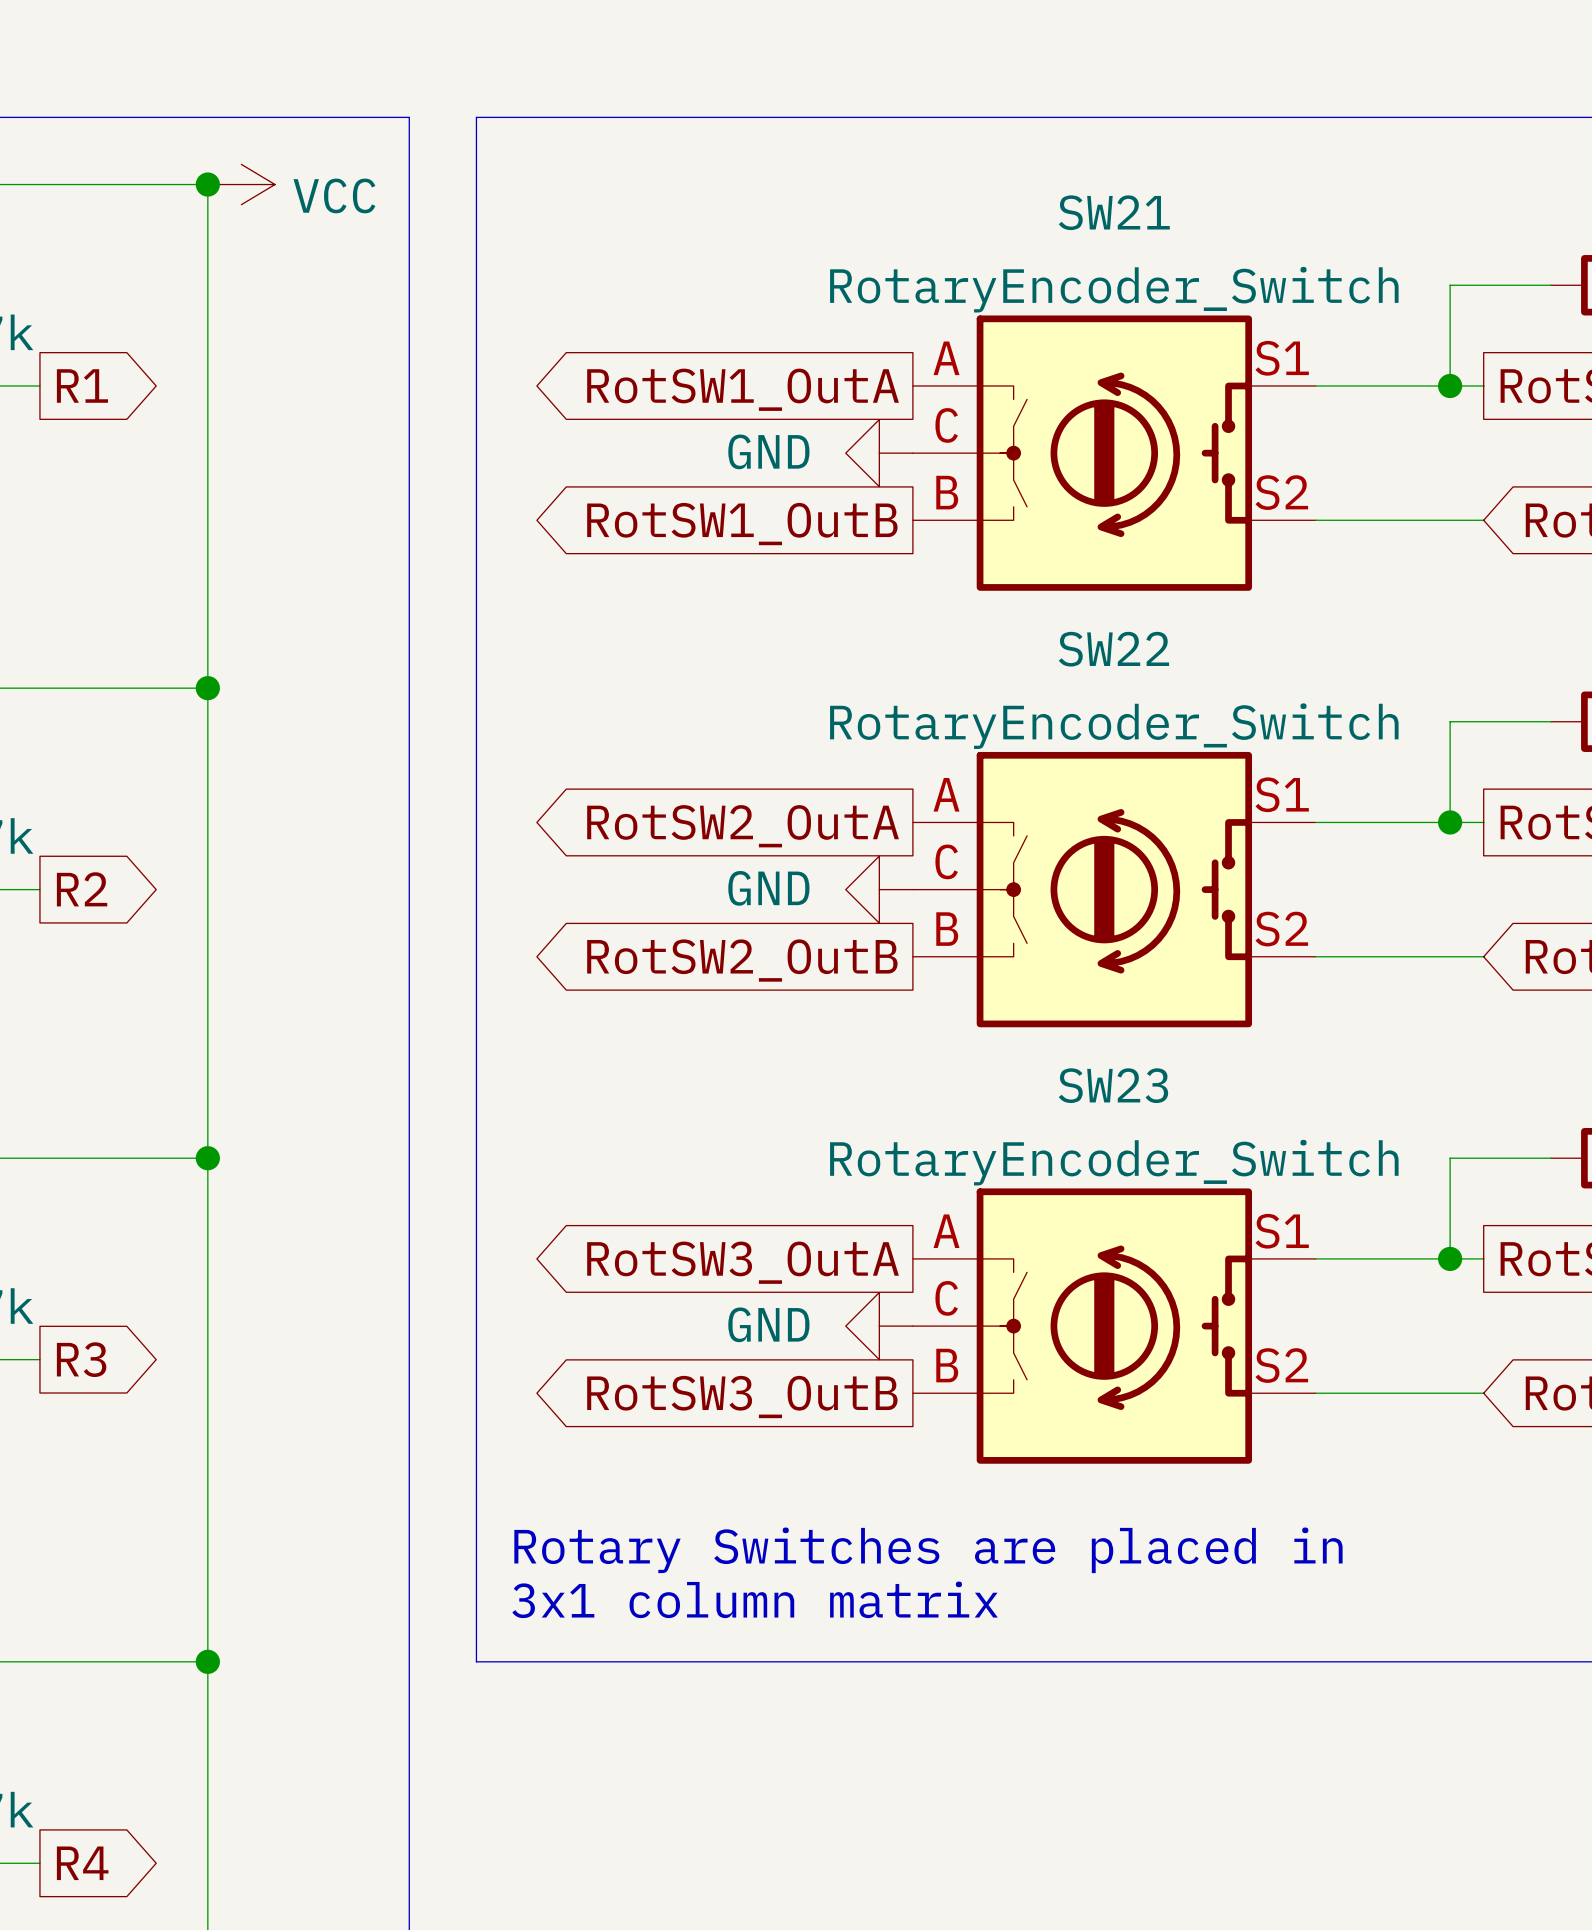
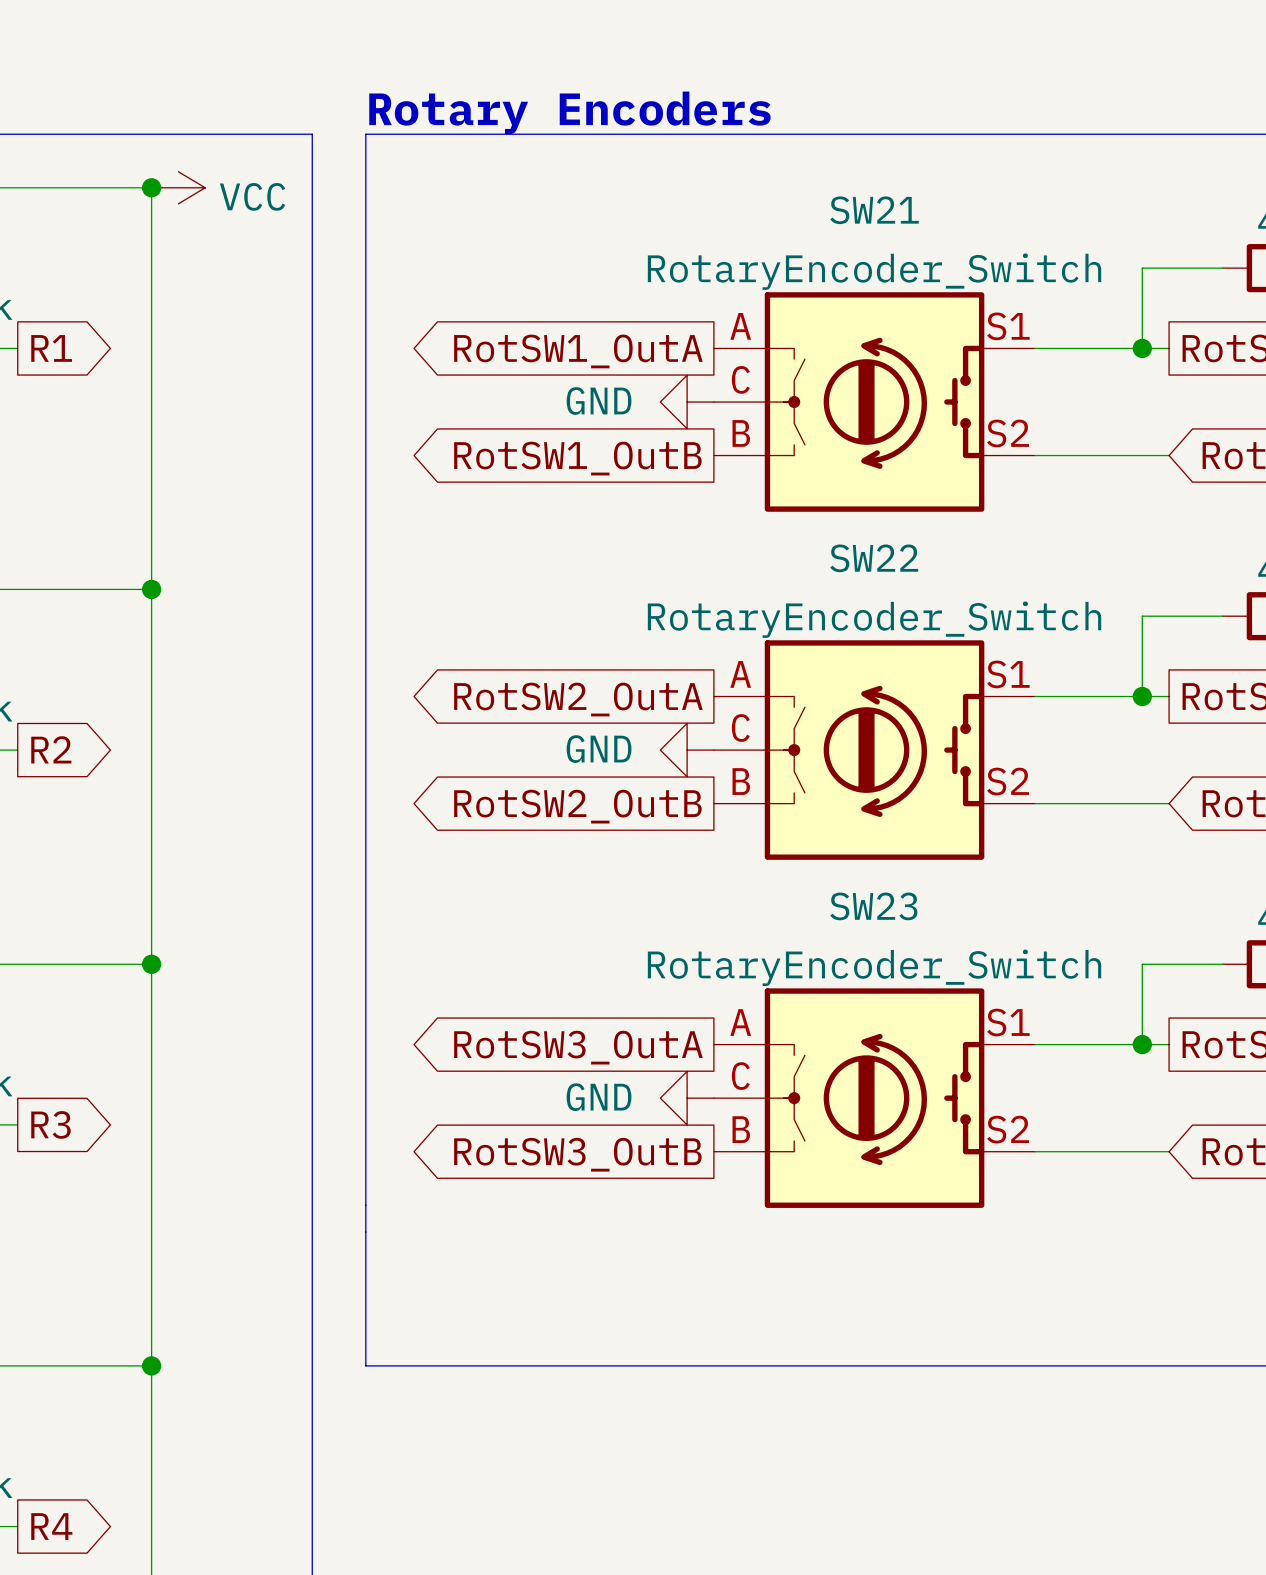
text: none -> Rotary Encoders (569, 112)
text: Rotary Switches are placed in (928, 1550) -> none
text: 3x1 column matrix (755, 1599) -> none

